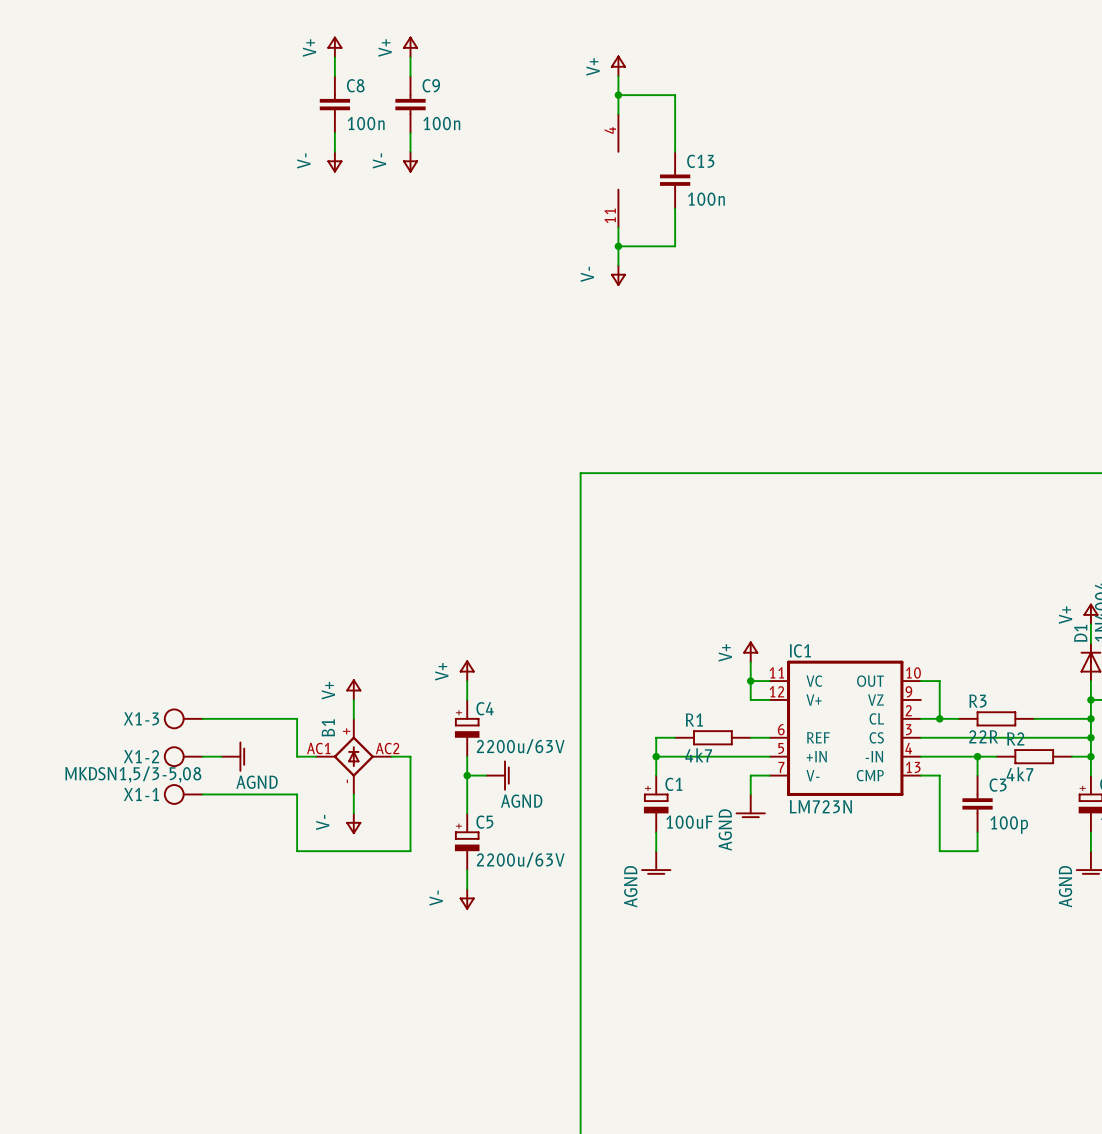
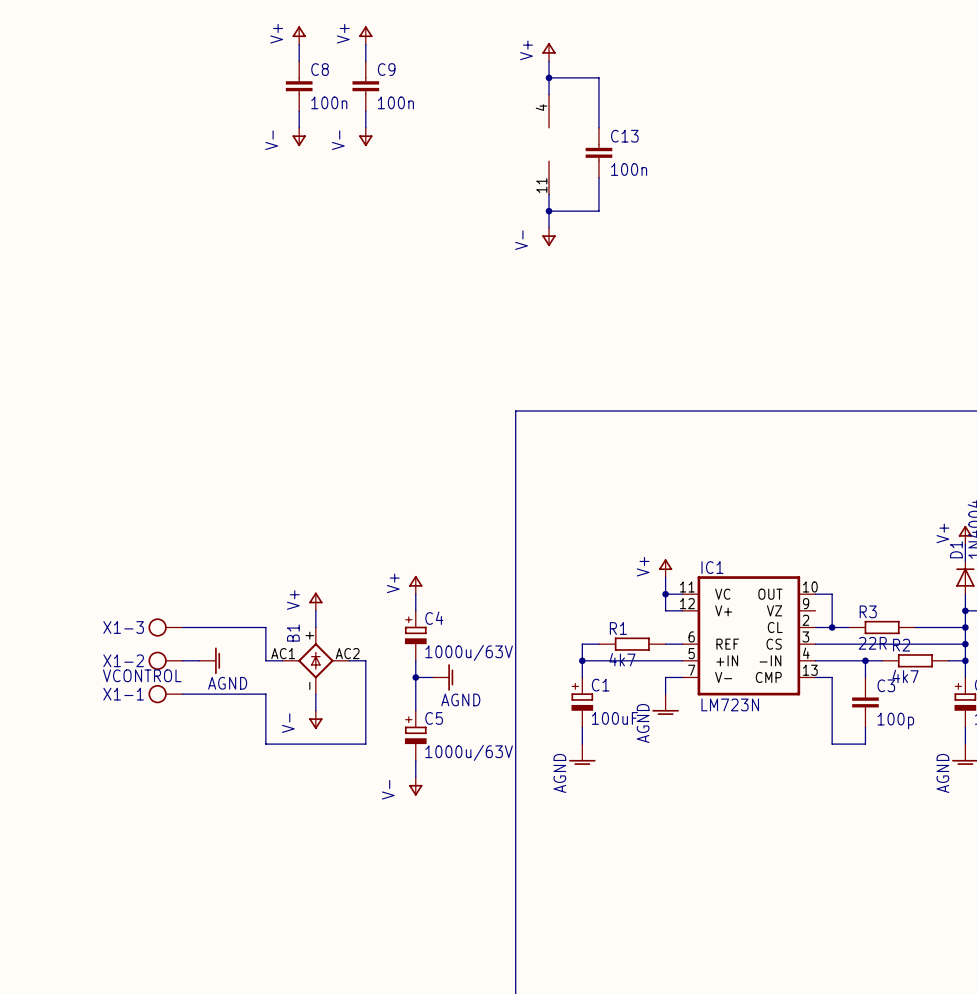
C4 value: 2200u/63V (520, 746) -> 1000u/63V (469, 652)
X1-1 value: MKDSN1,5/3-5,08 (133, 774) -> VCONTROL (142, 675)
C5 value: 2200u/63V (520, 859) -> 1000u/63V (469, 752)

